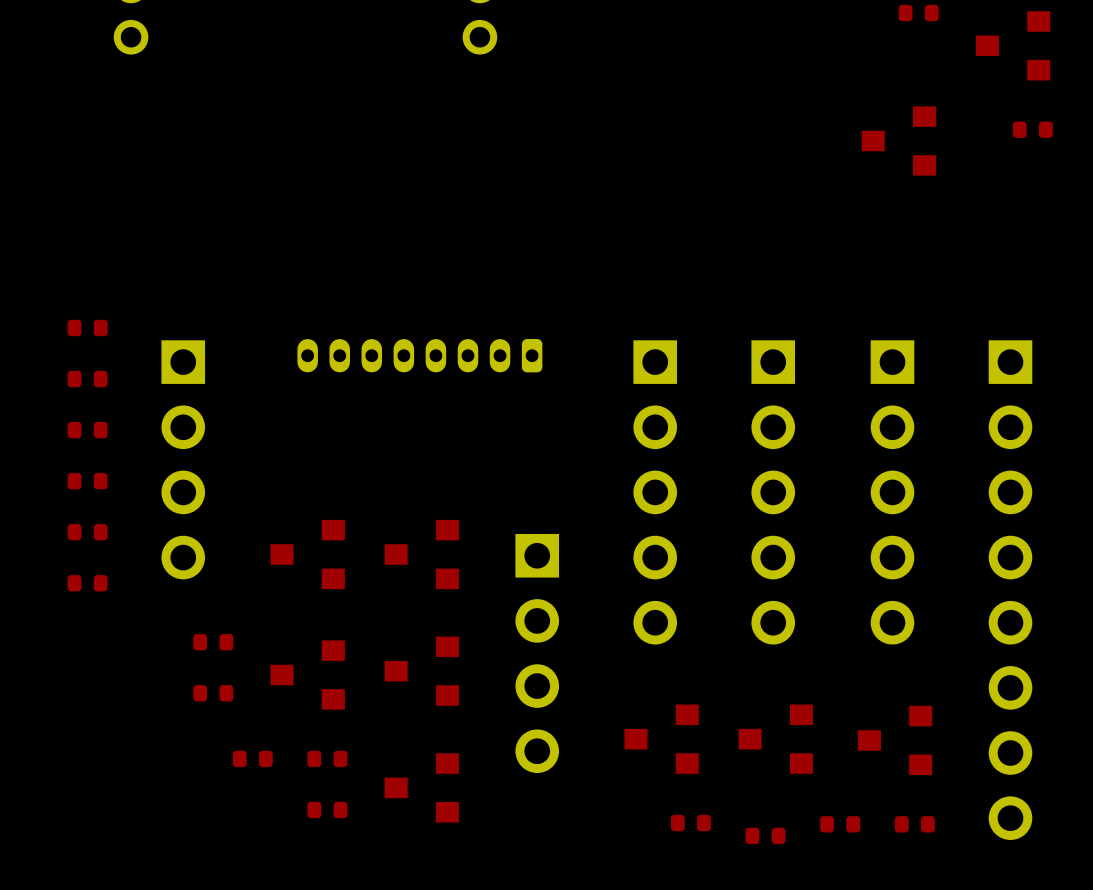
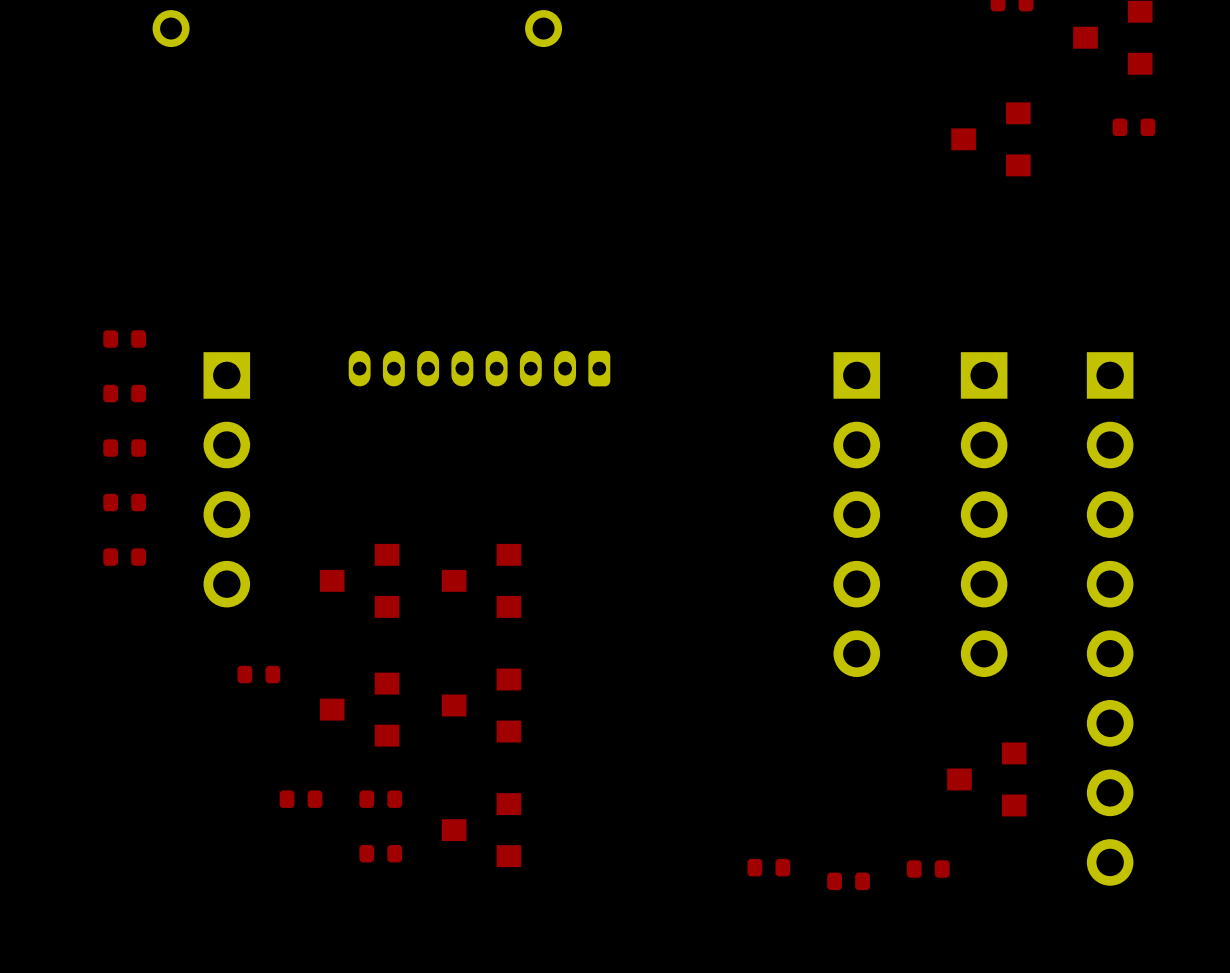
part: (655, 492) -> none
part: (87, 583) -> none
part: (537, 653) -> none
part: (213, 693) -> none
part: (661, 739) -> none
part: (775, 739) -> none
part: (914, 824) -> none

